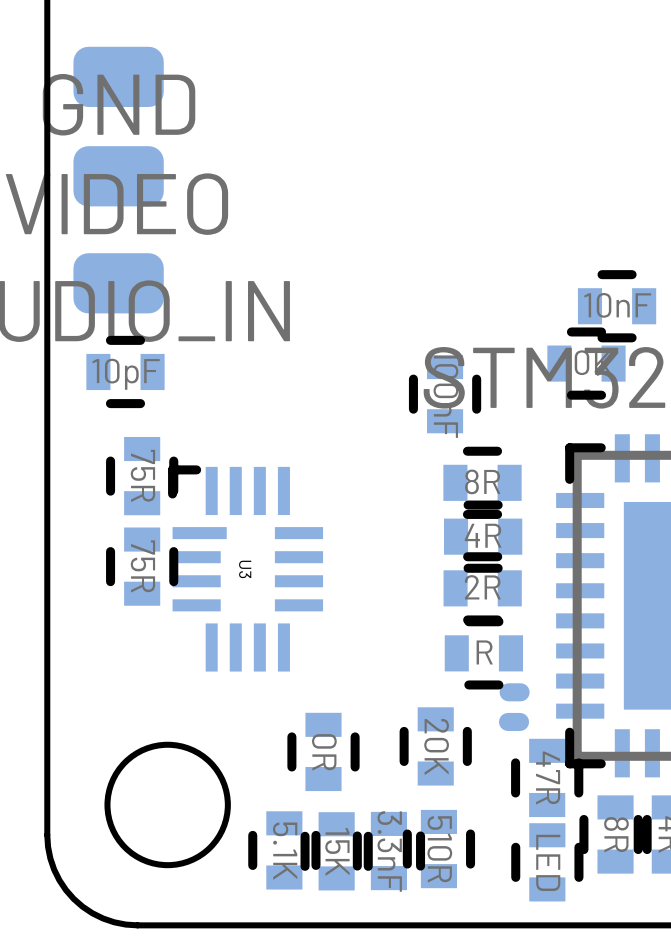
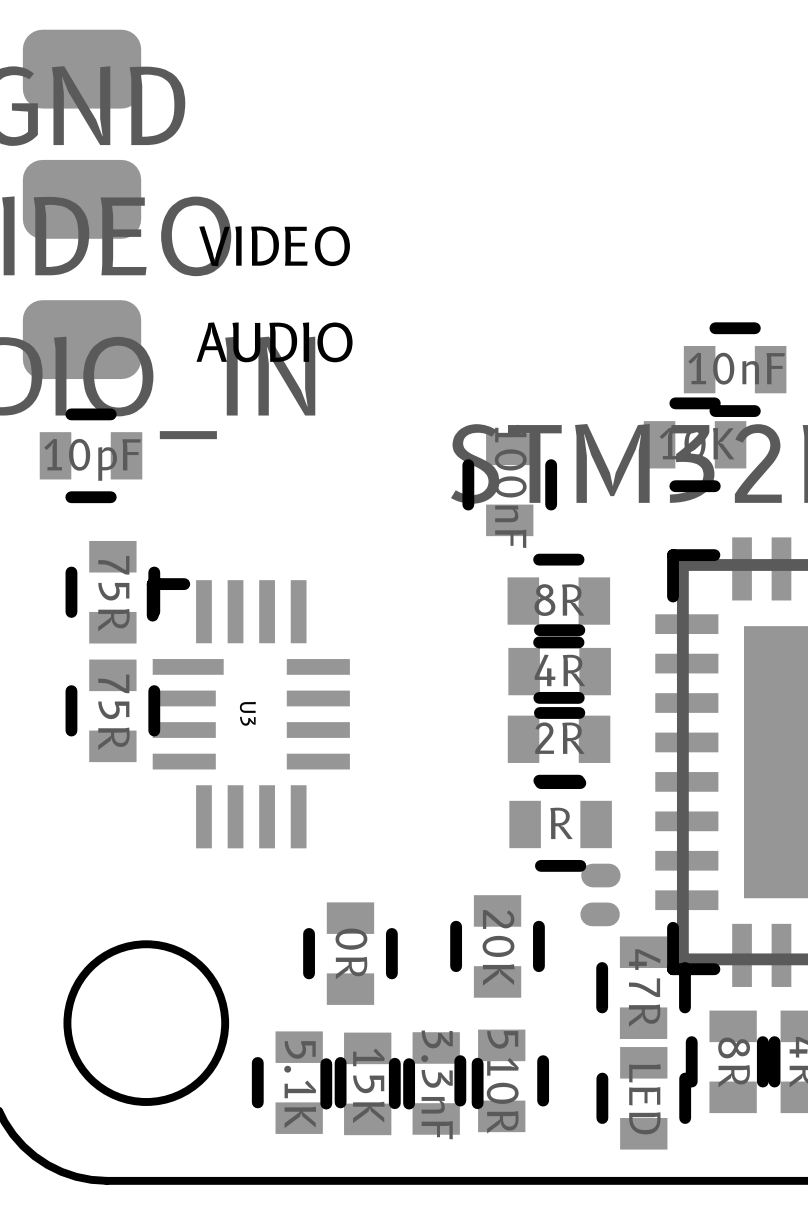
text: none -> VIDEO (274, 246)
text: none -> AUDIO (274, 342)

